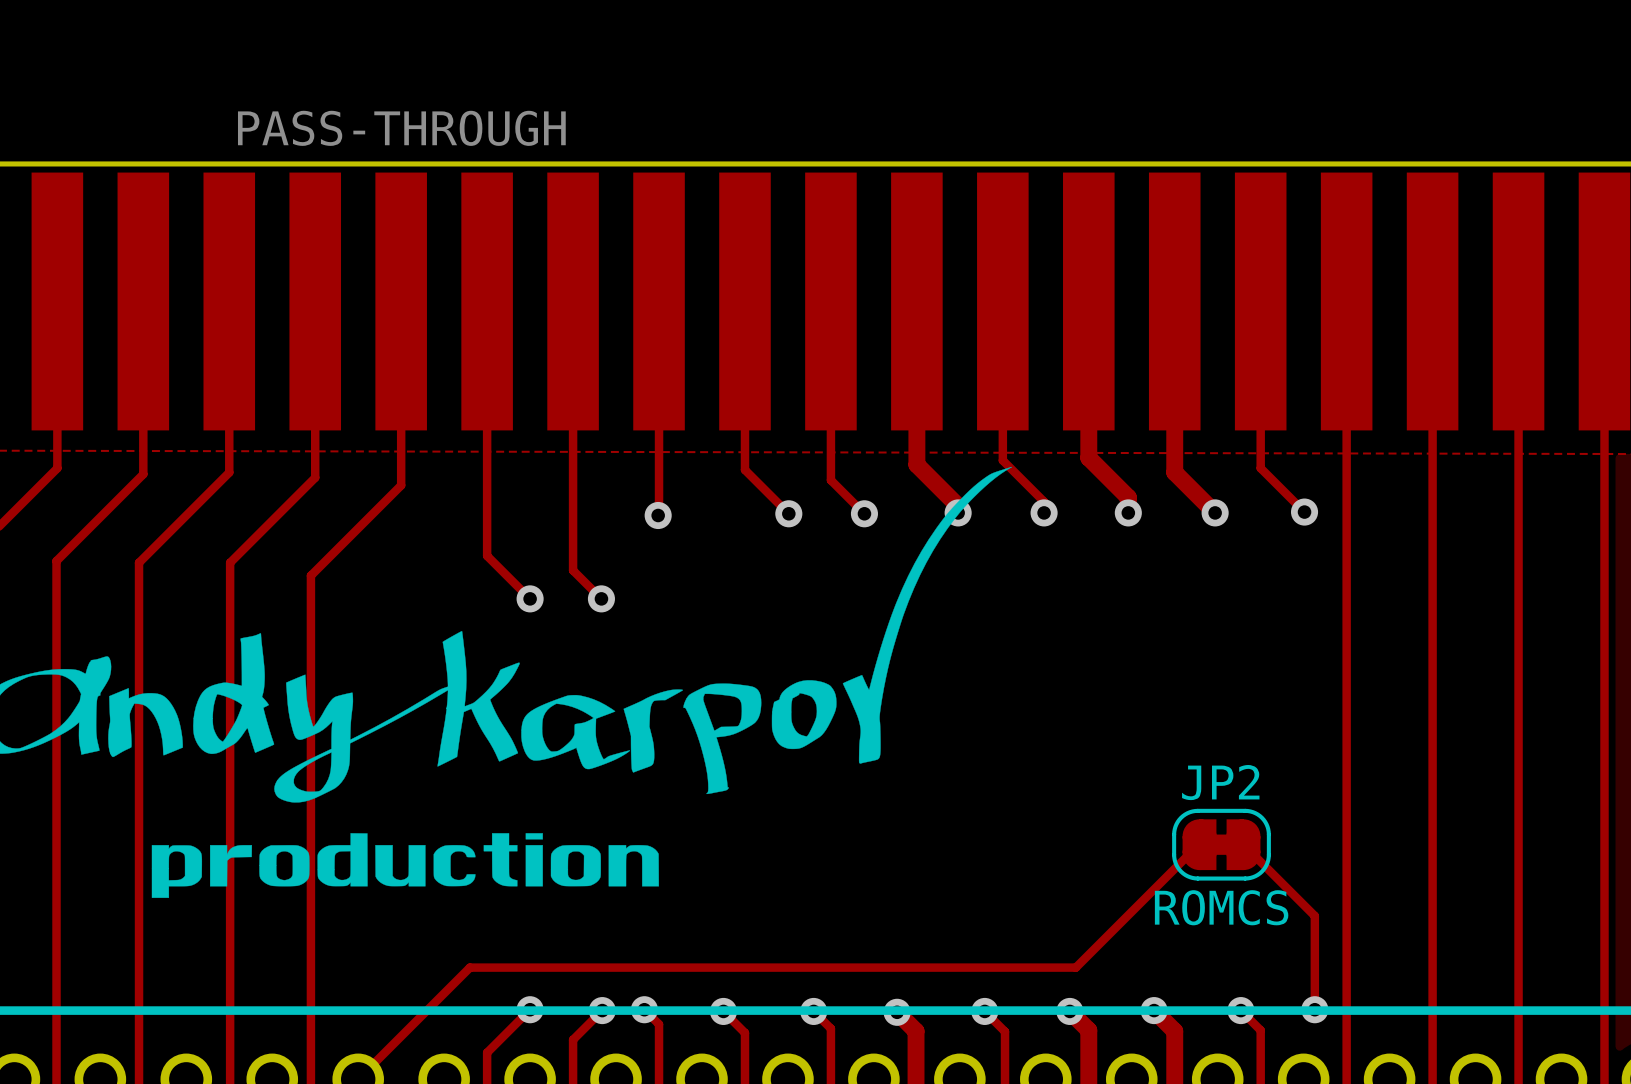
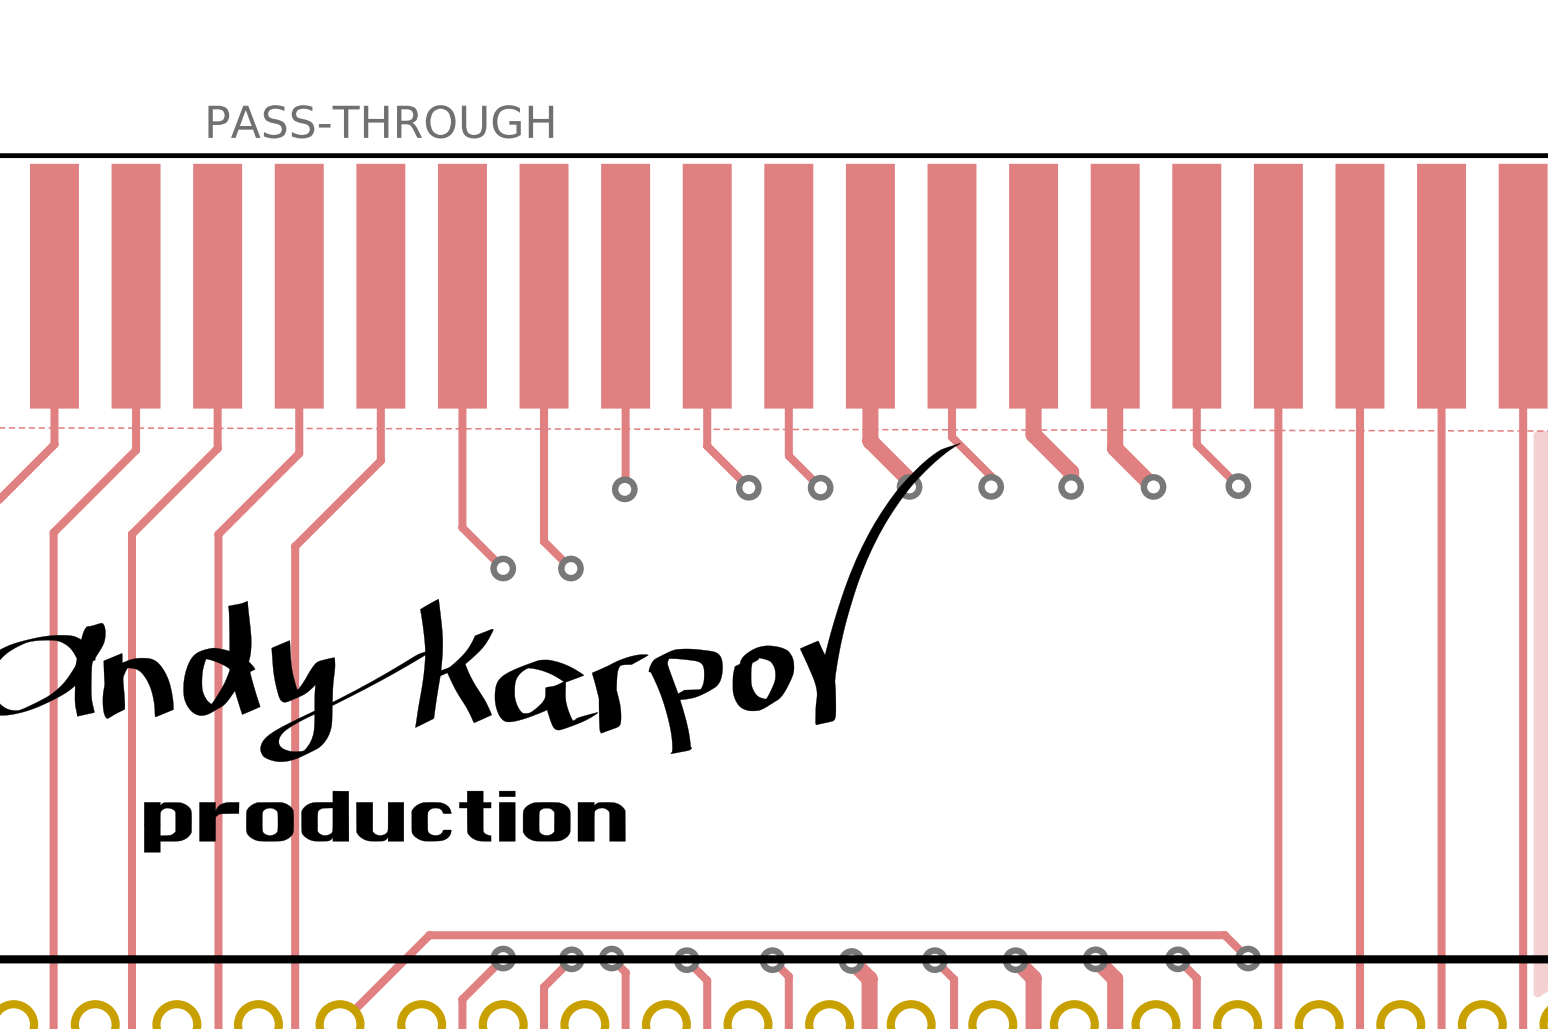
track: (1199, 844) (1075, 967) (469, 967) (452, 985) -> (1248, 958) (1224, 935) (429, 935)
JP2: ROMCS (1221, 844) -> none
track: (1243, 844) (1314, 916) (1314, 1009) -> none

